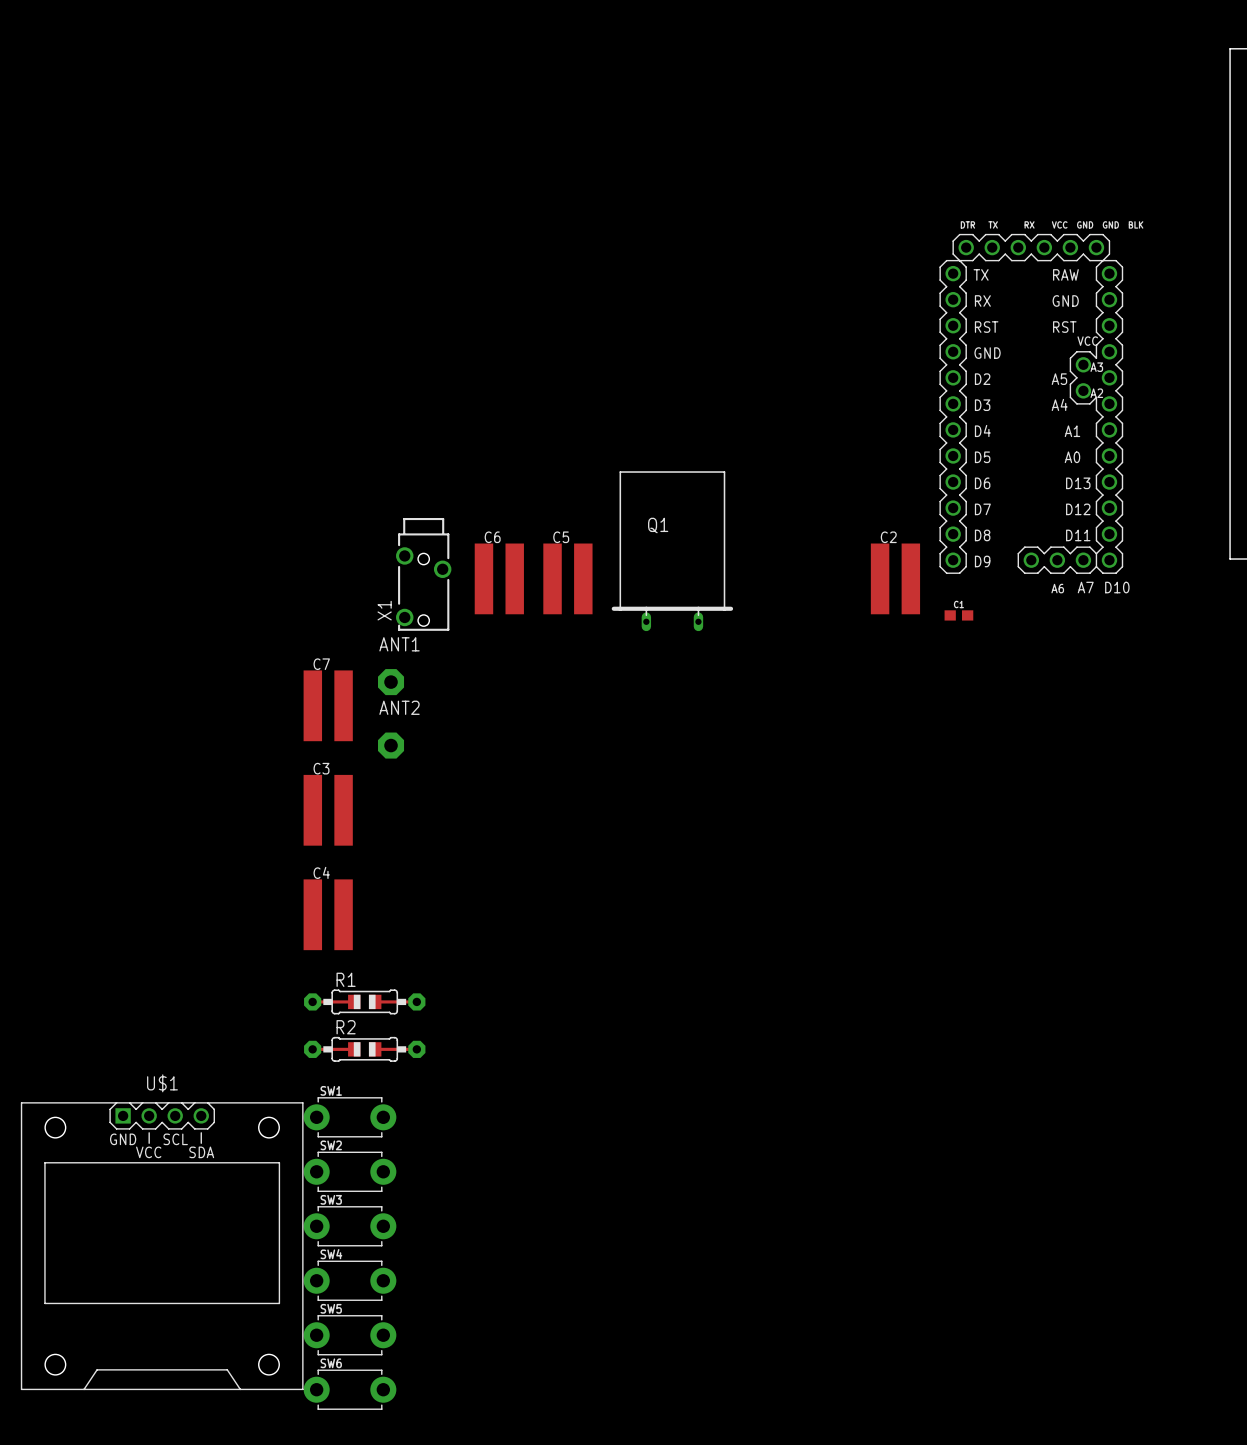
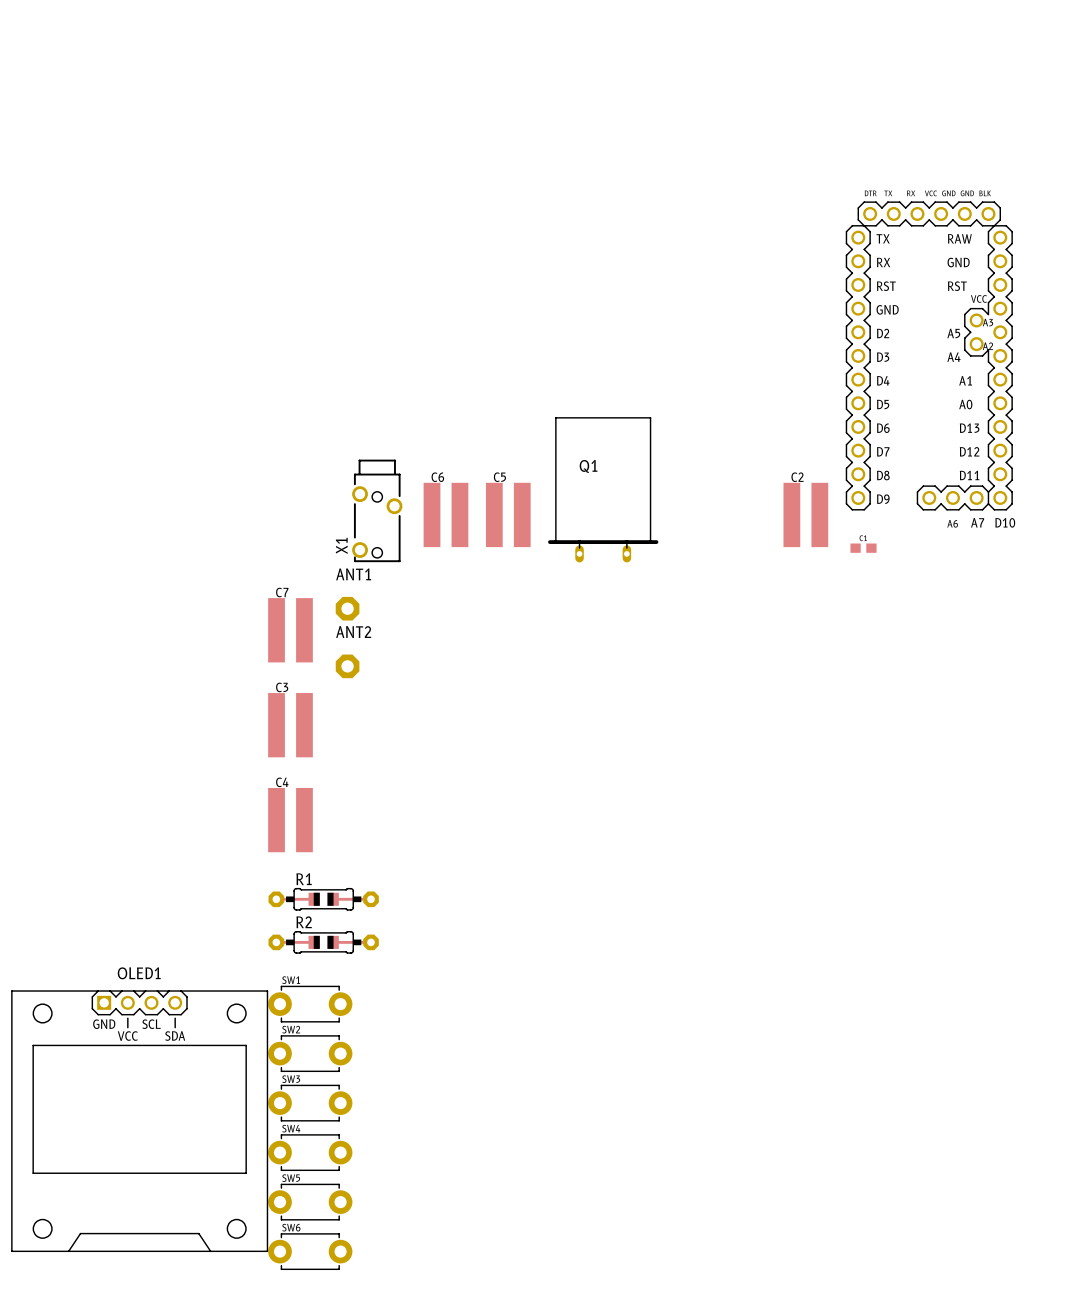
U$1 name: U$1 (162, 1083) -> OLED1 (139, 973)

